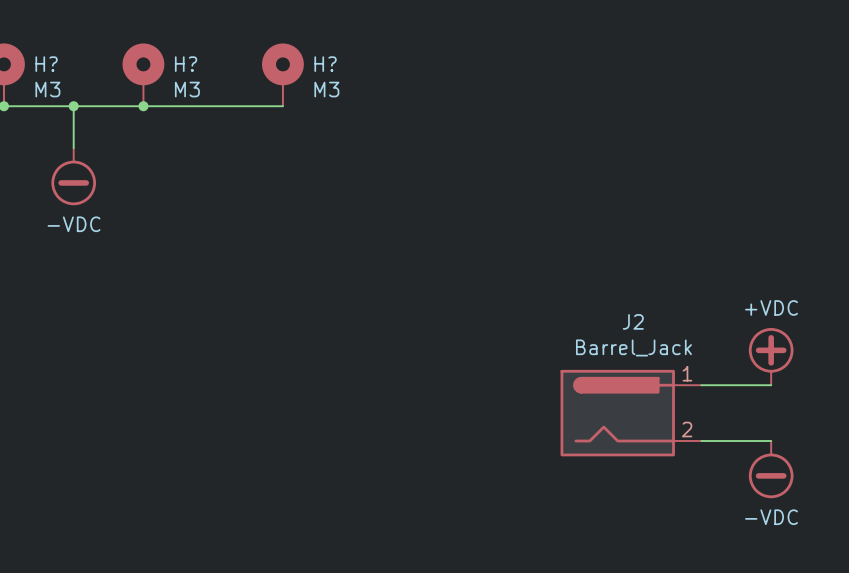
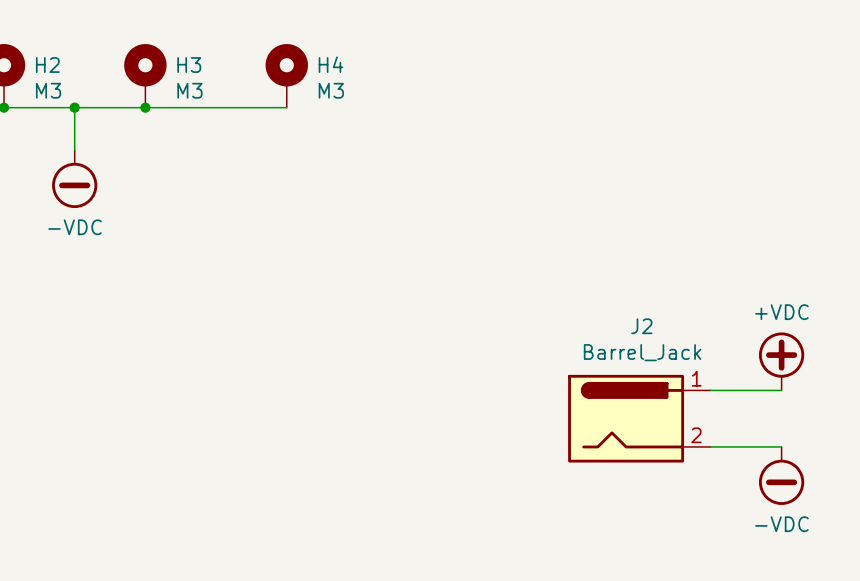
H? name: H? (46, 64) -> H2 (47, 65)
H? name: H? (186, 64) -> H3 (189, 65)
H? name: H? (325, 64) -> H4 (330, 64)

